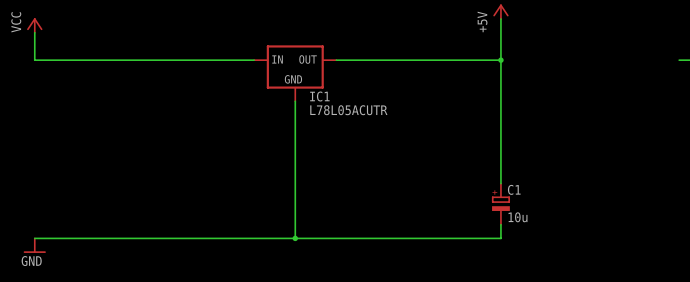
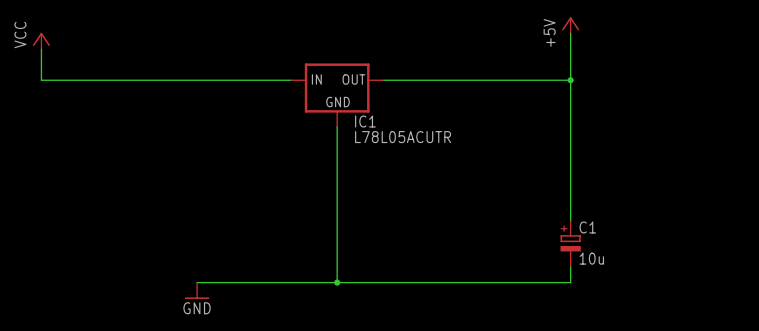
wire: (34, 238) (171, 238) -> none
power symbol: GND (34, 245) -> none
power symbol: none -> GND (197, 290)

